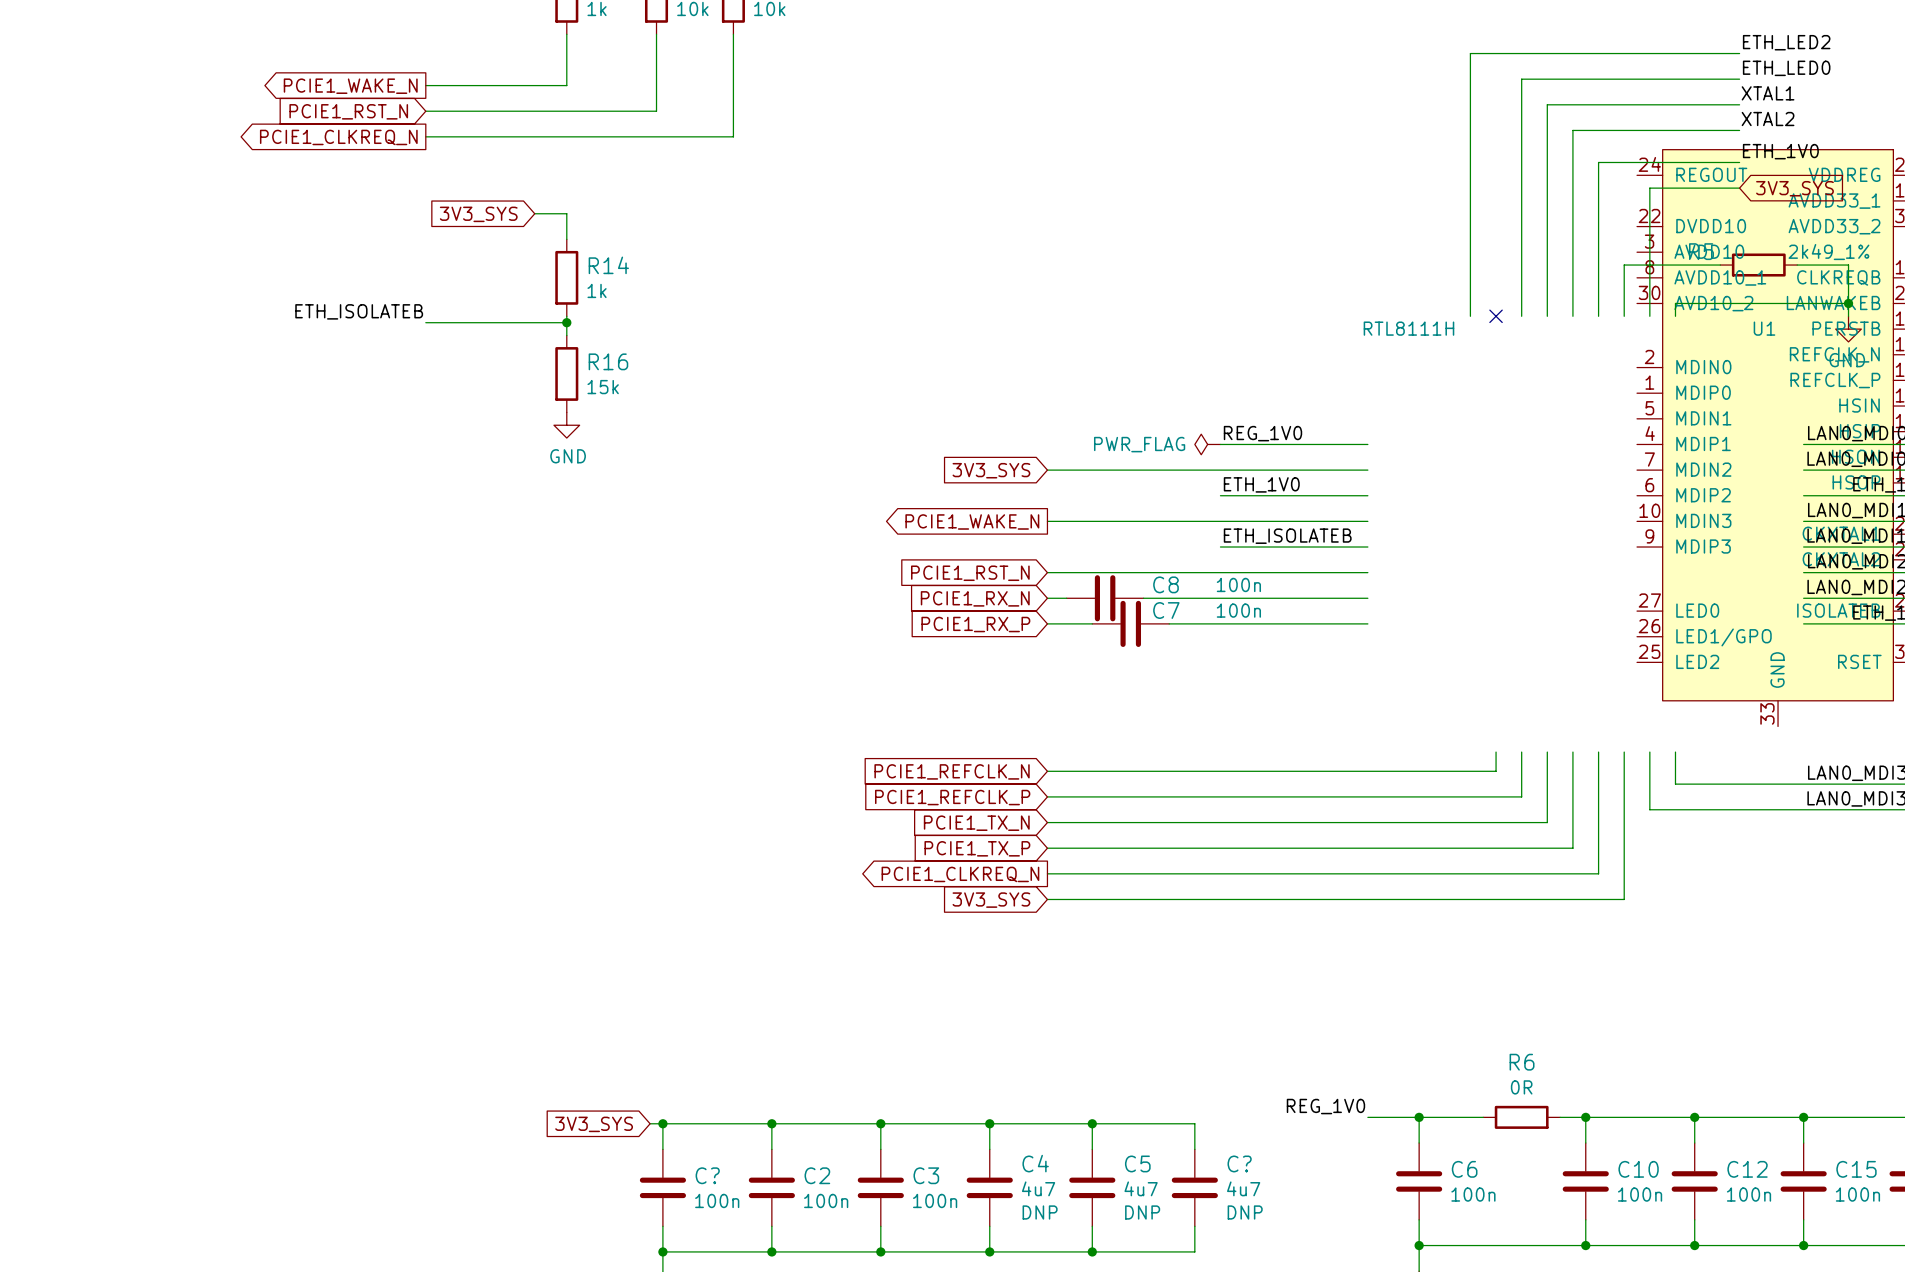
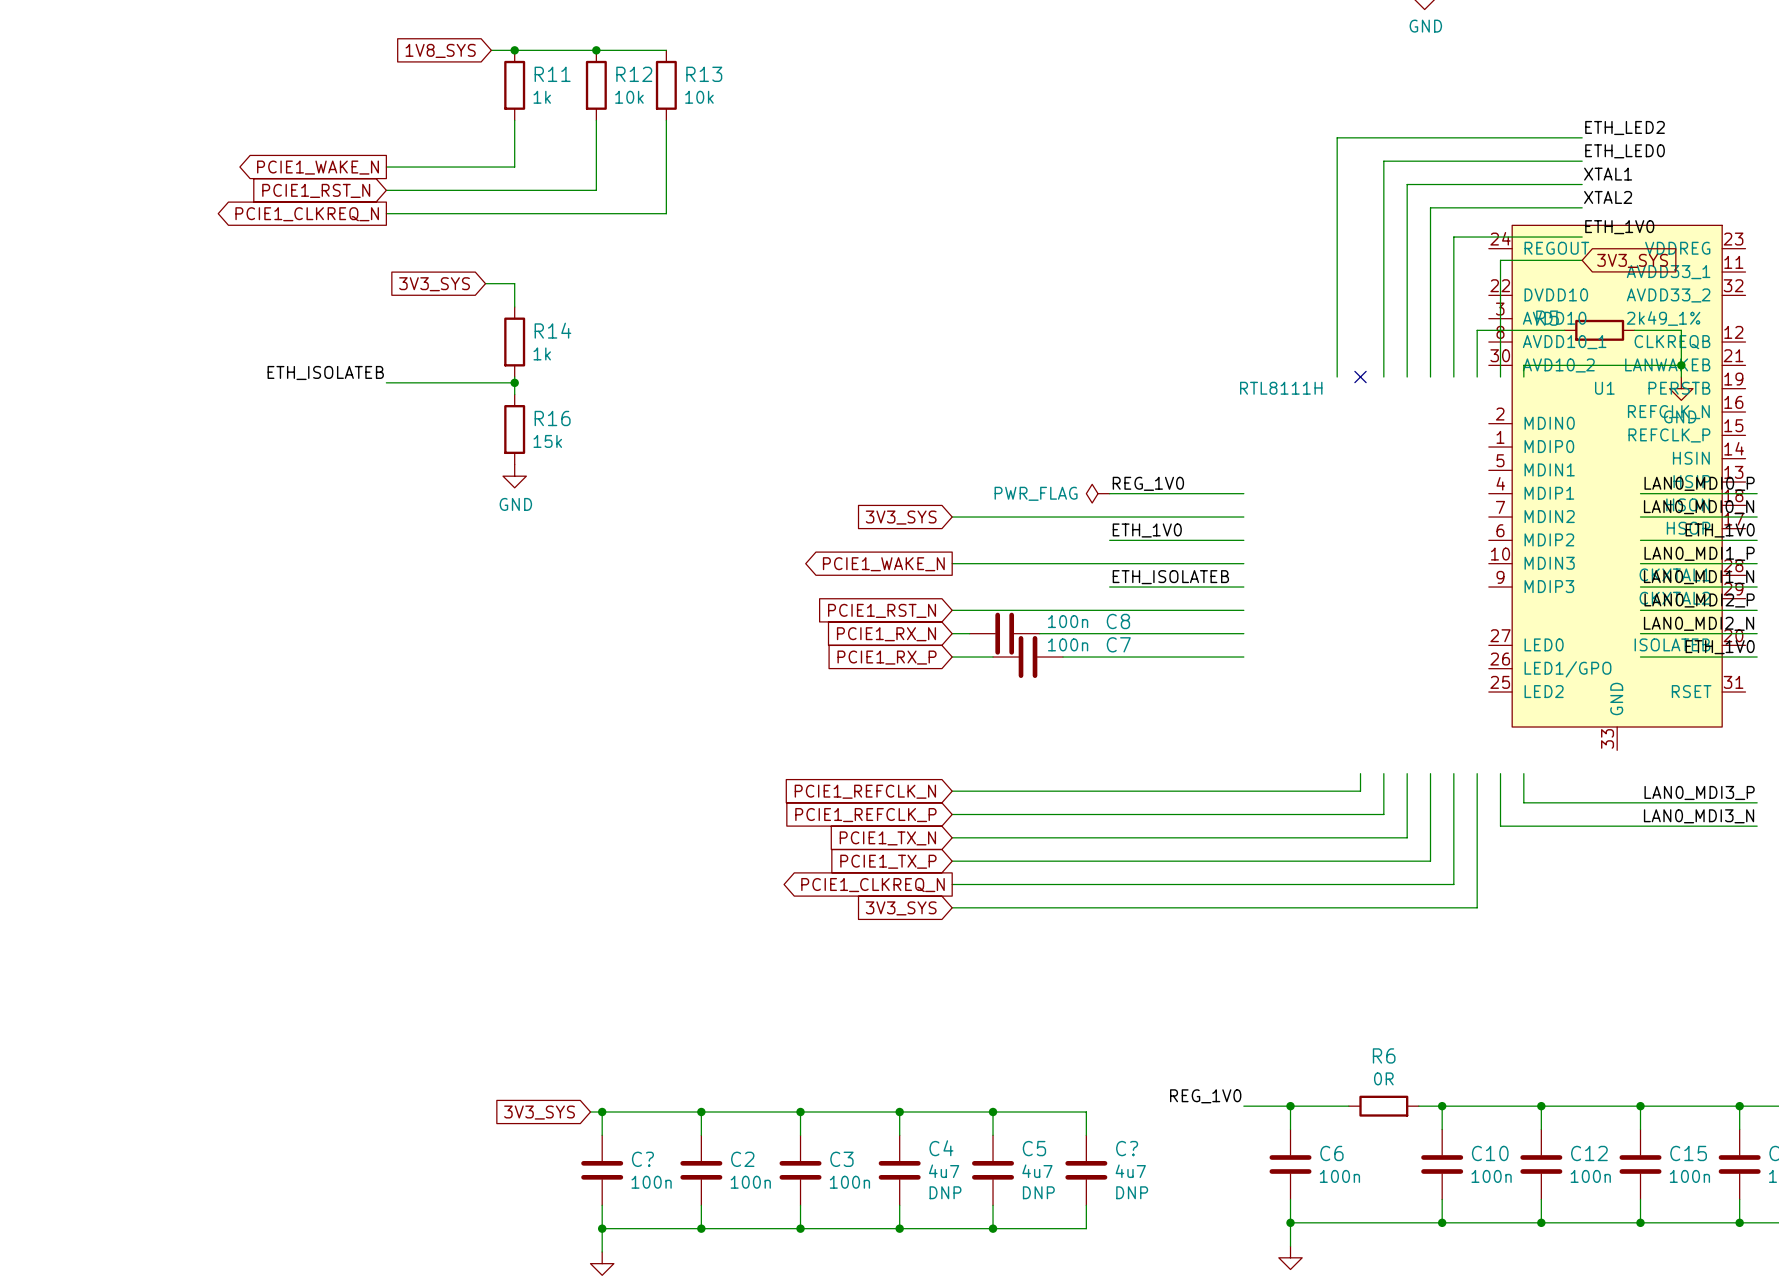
C8 name position: C8 (1166, 584) -> C8 (1118, 621)
C8 text position: 100n (1238, 584) -> 100n (1068, 621)
C7 name position: C7 (1166, 610) -> C7 (1118, 644)
C7 text position: 100n (1238, 610) -> 100n (1068, 644)

